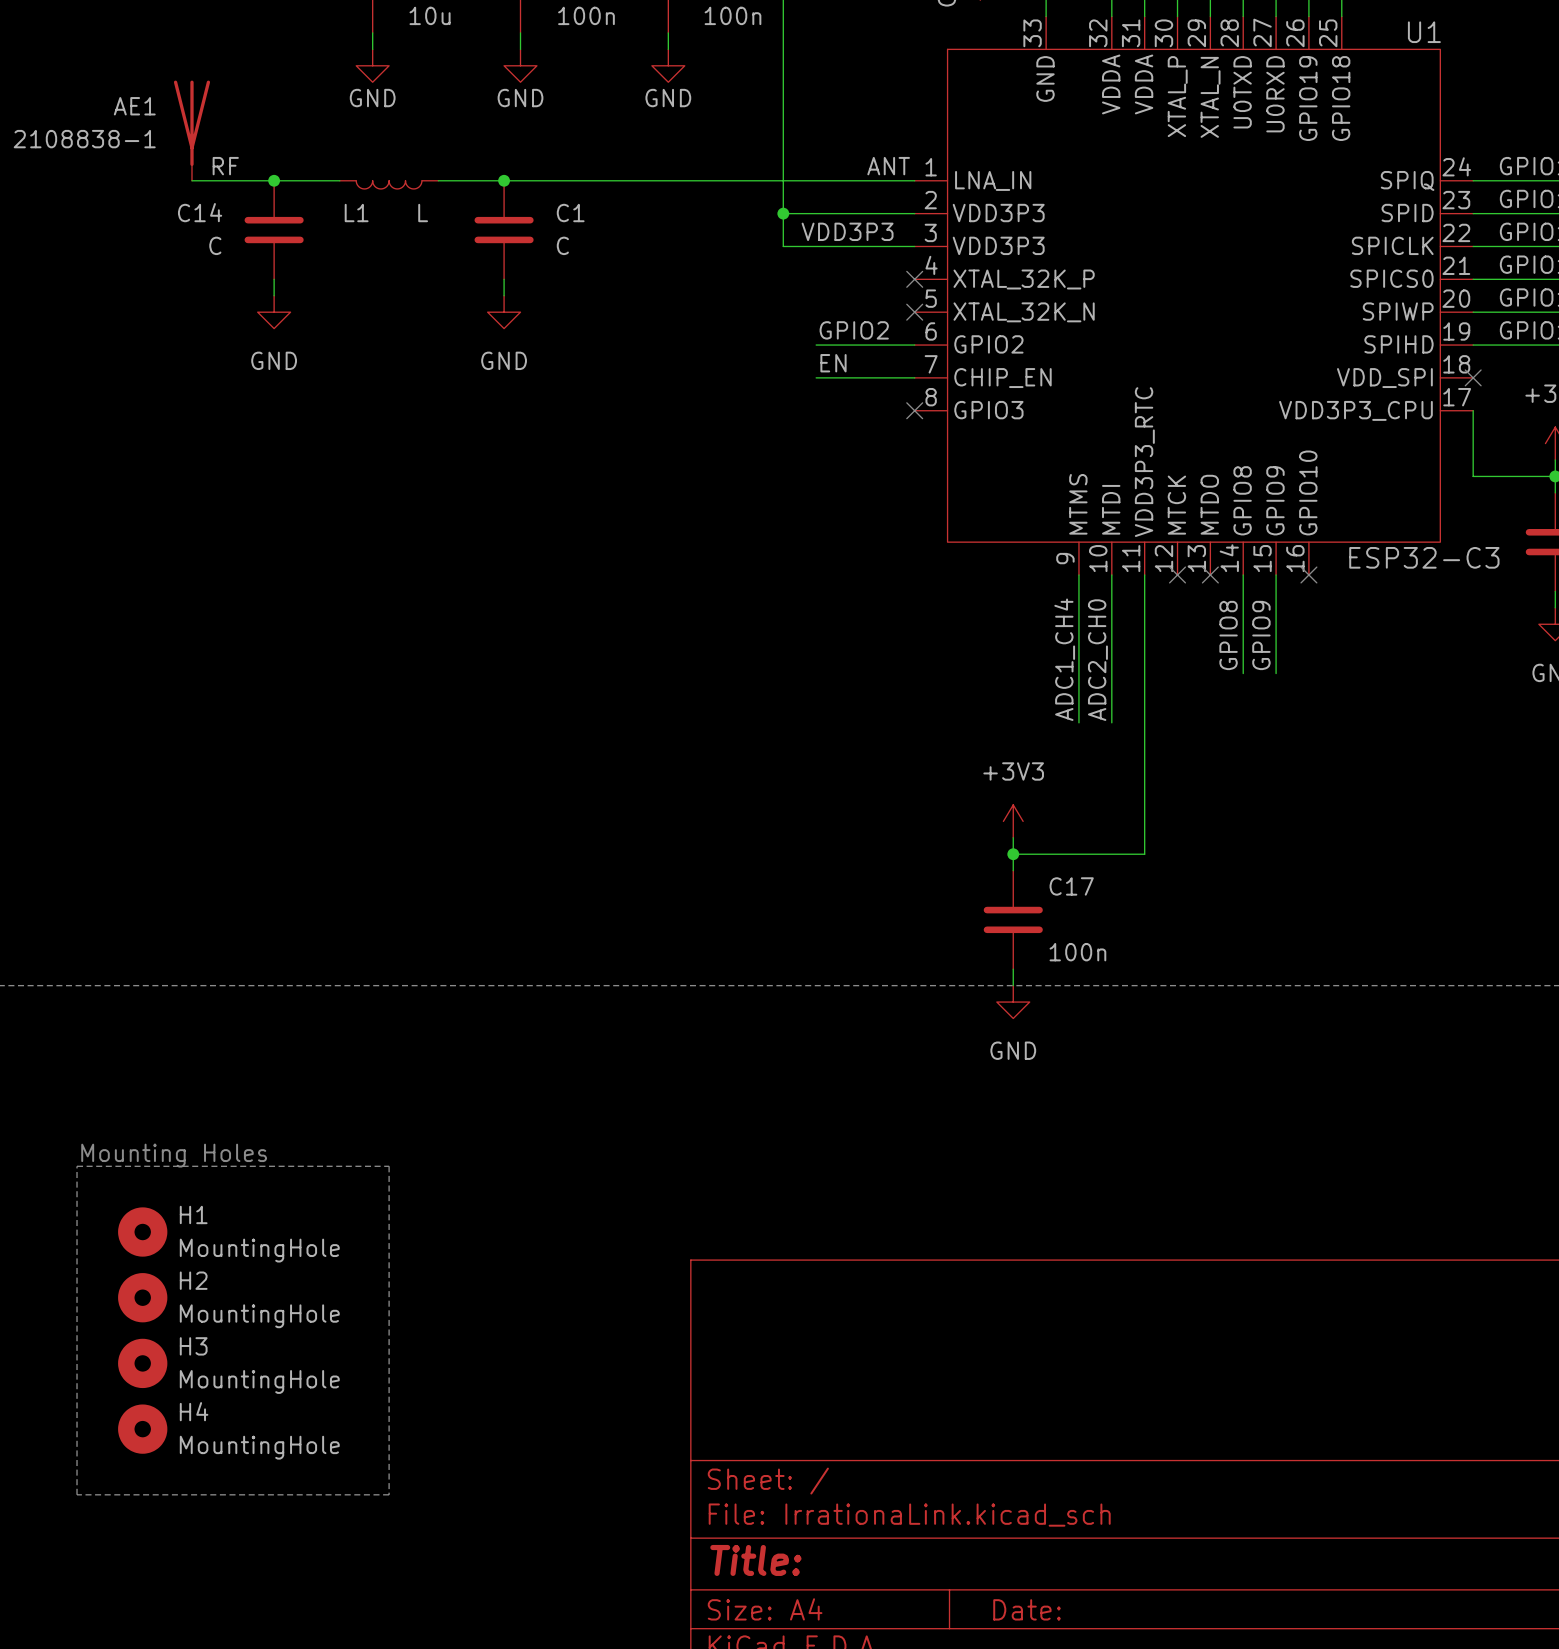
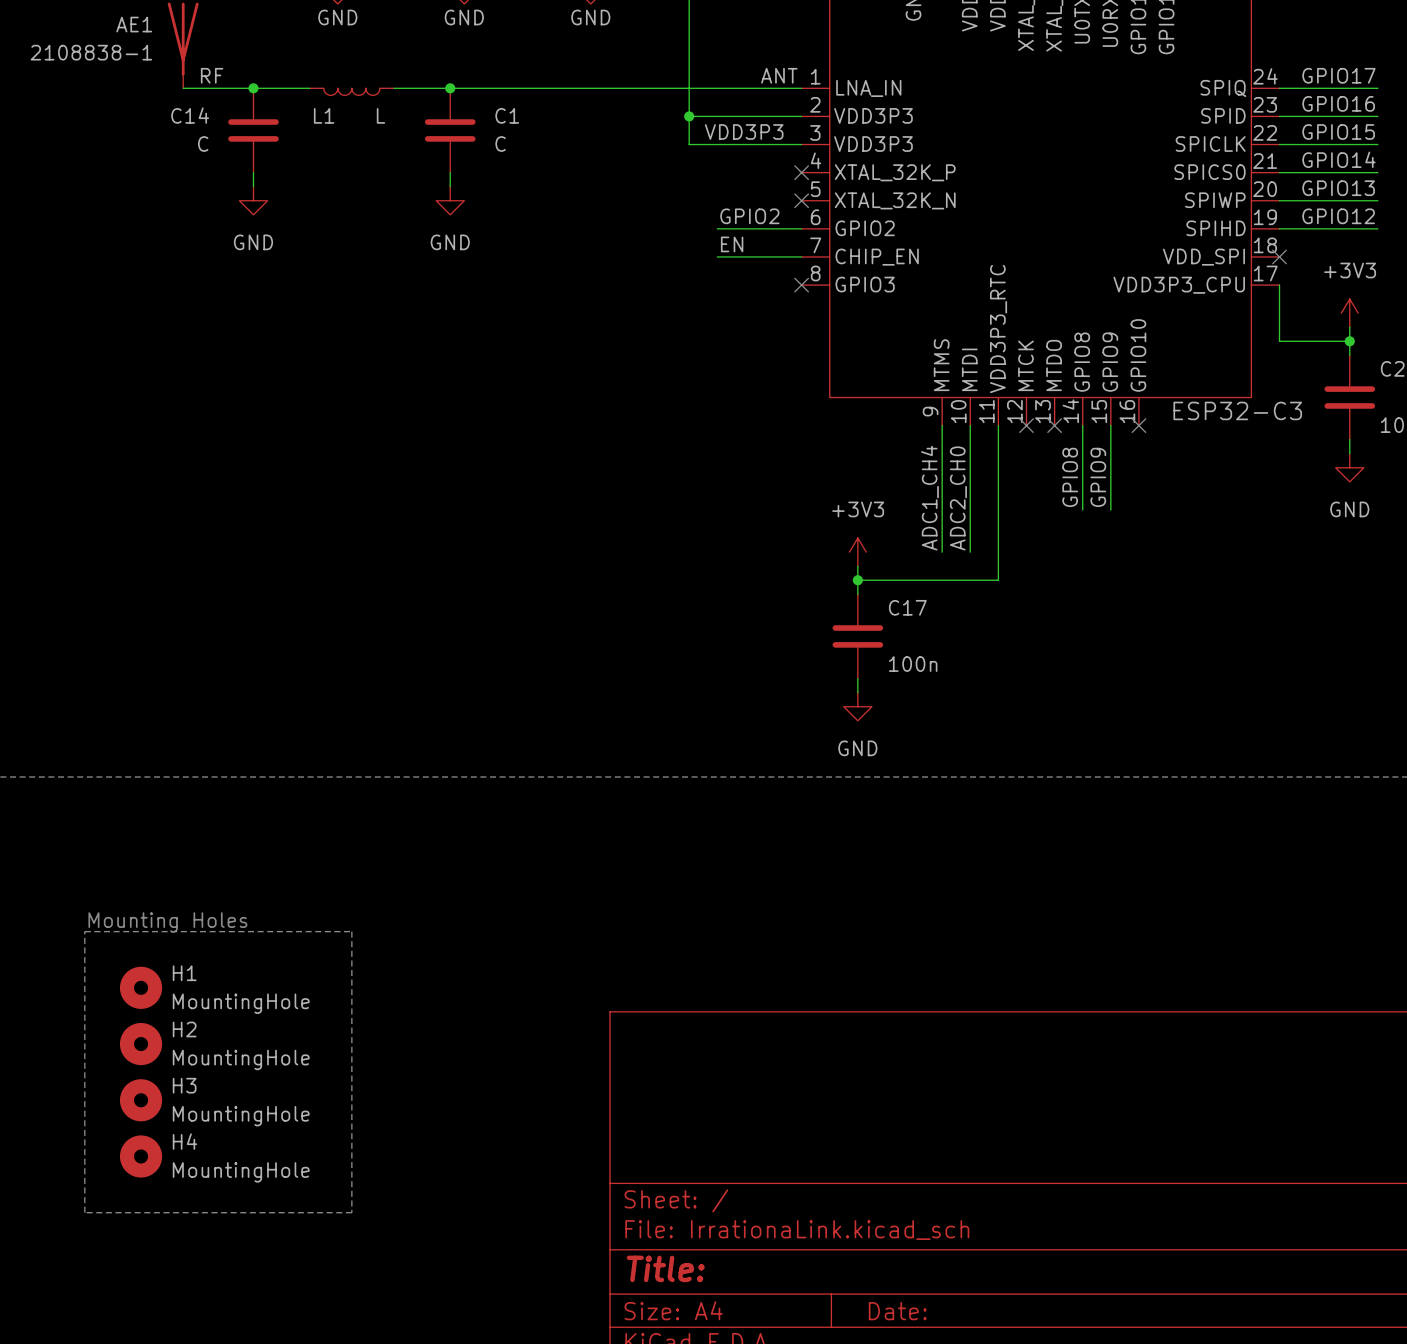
junction: none -> (857, 580)
wire: (1144, 755) (1144, 854) (1013, 854) -> (998, 580) (857, 580)
power symbol position: +3V3 (1013, 821) -> +3V3 (857, 552)
wire: (1013, 837) (1013, 870) -> (857, 566) (857, 594)
junction: (1013, 854) -> none
C17 position: (1013, 919) -> (857, 636)
wire: (1013, 969) (1013, 985) -> (857, 678) (857, 692)
power symbol position: GND (1013, 1002) -> GND (857, 706)

